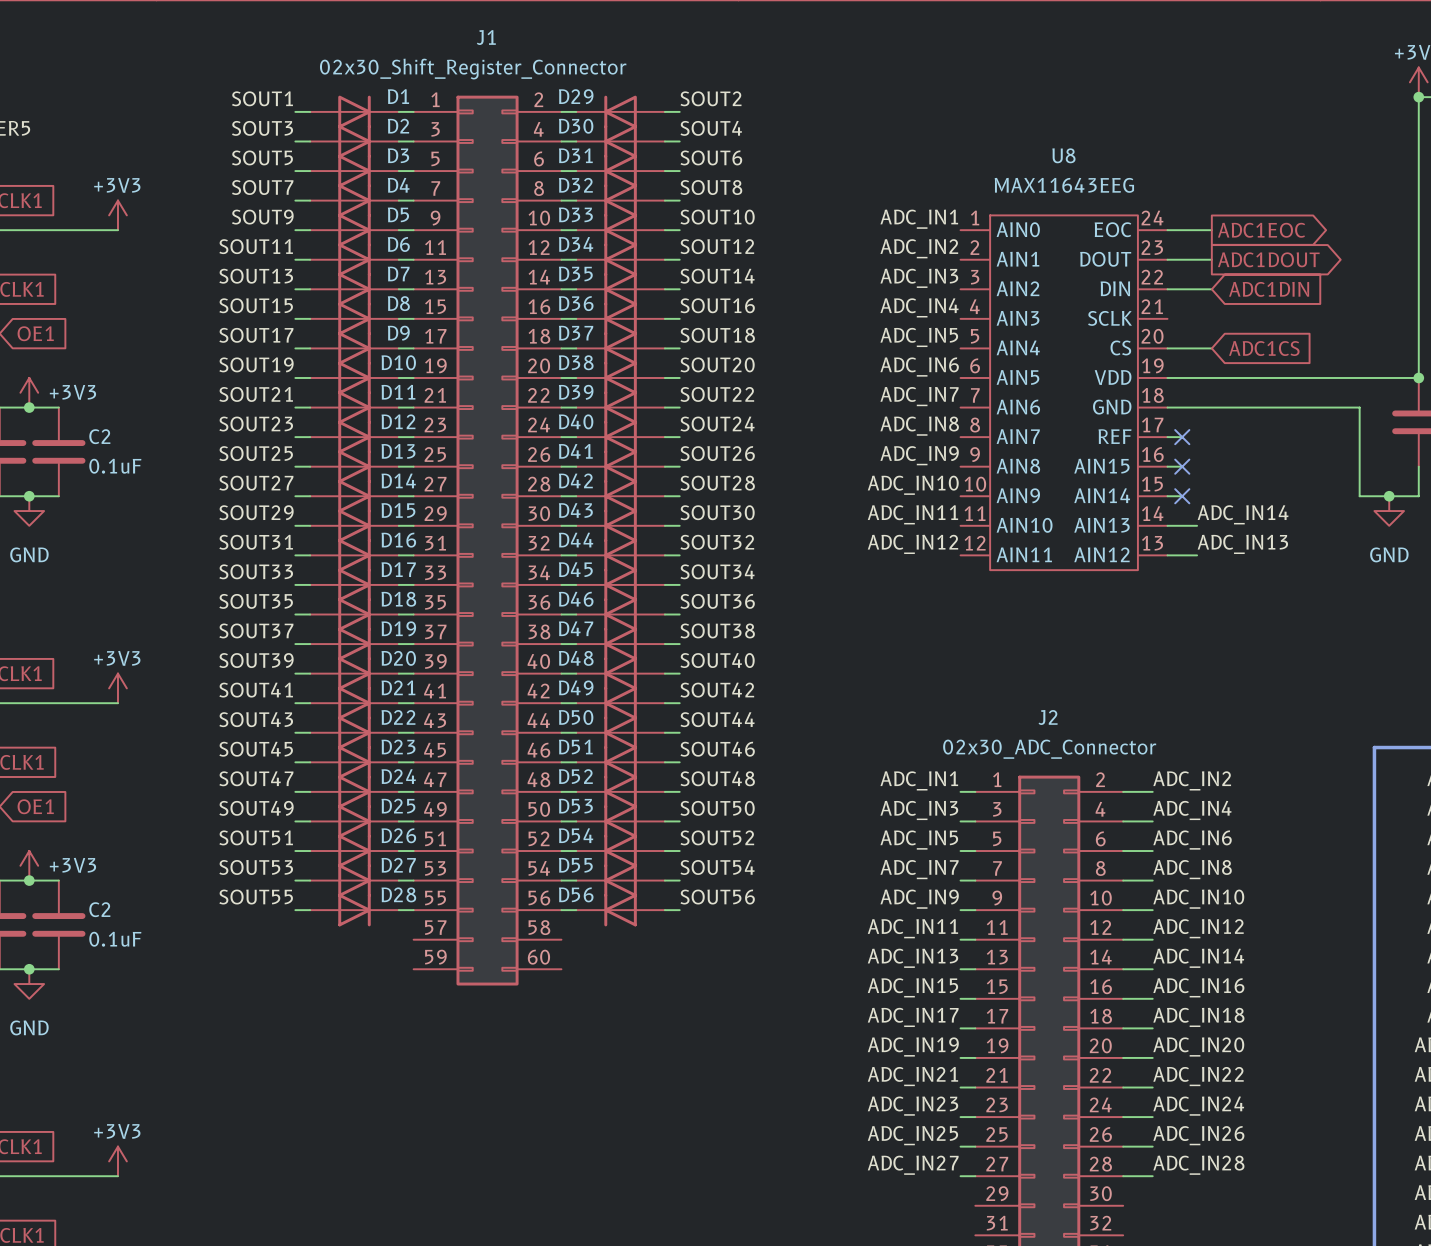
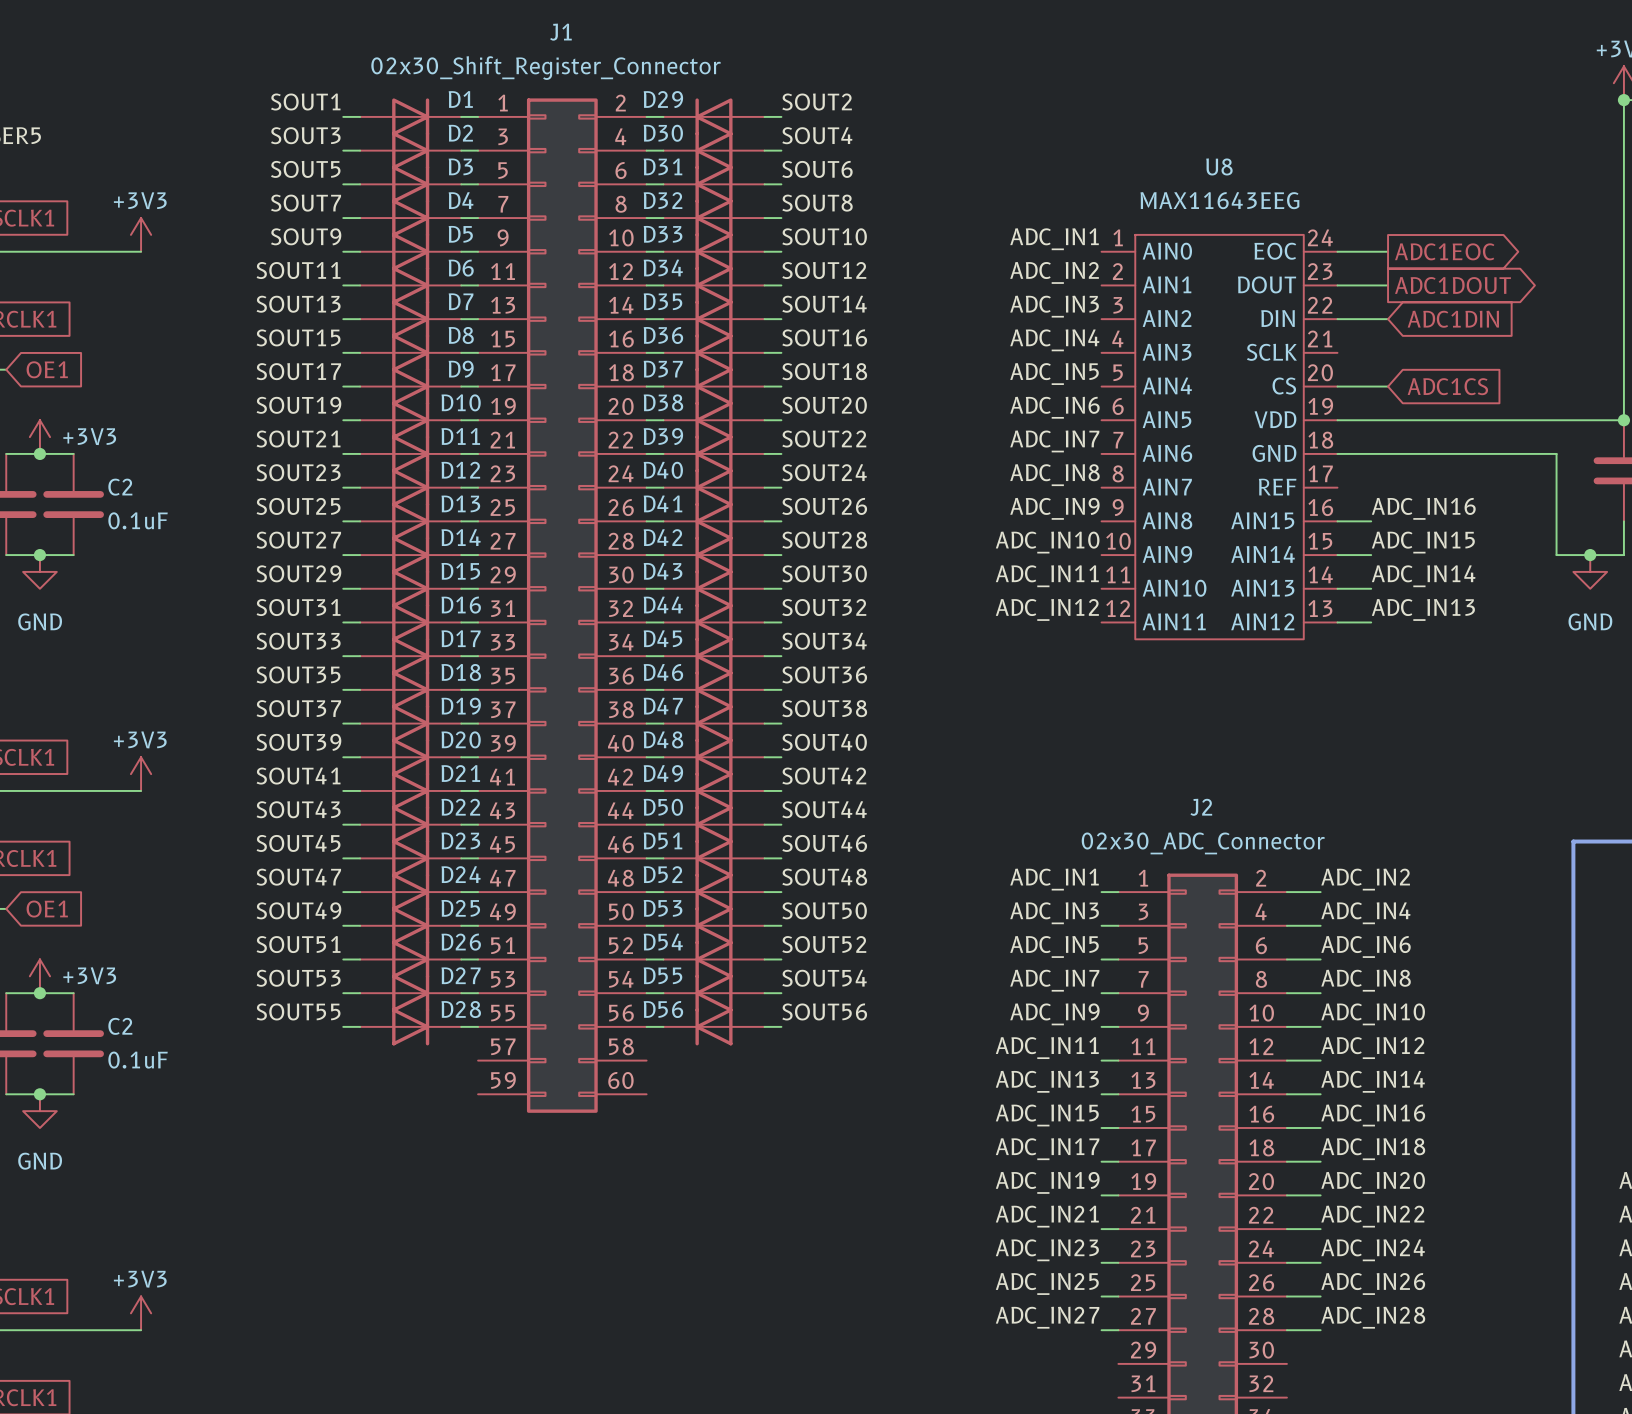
wire: (1167, 437) (1182, 437) -> (1354, 521) (1371, 521)
no-connect mark: (1182, 437) -> none
label: none -> ADC_IN16 (1423, 508)
no-connect mark: (1182, 466) -> none
label: none -> ADC_IN15 (1423, 542)
wire: none -> (1354, 555) (1371, 555)
no-connect mark: (1182, 496) -> none

